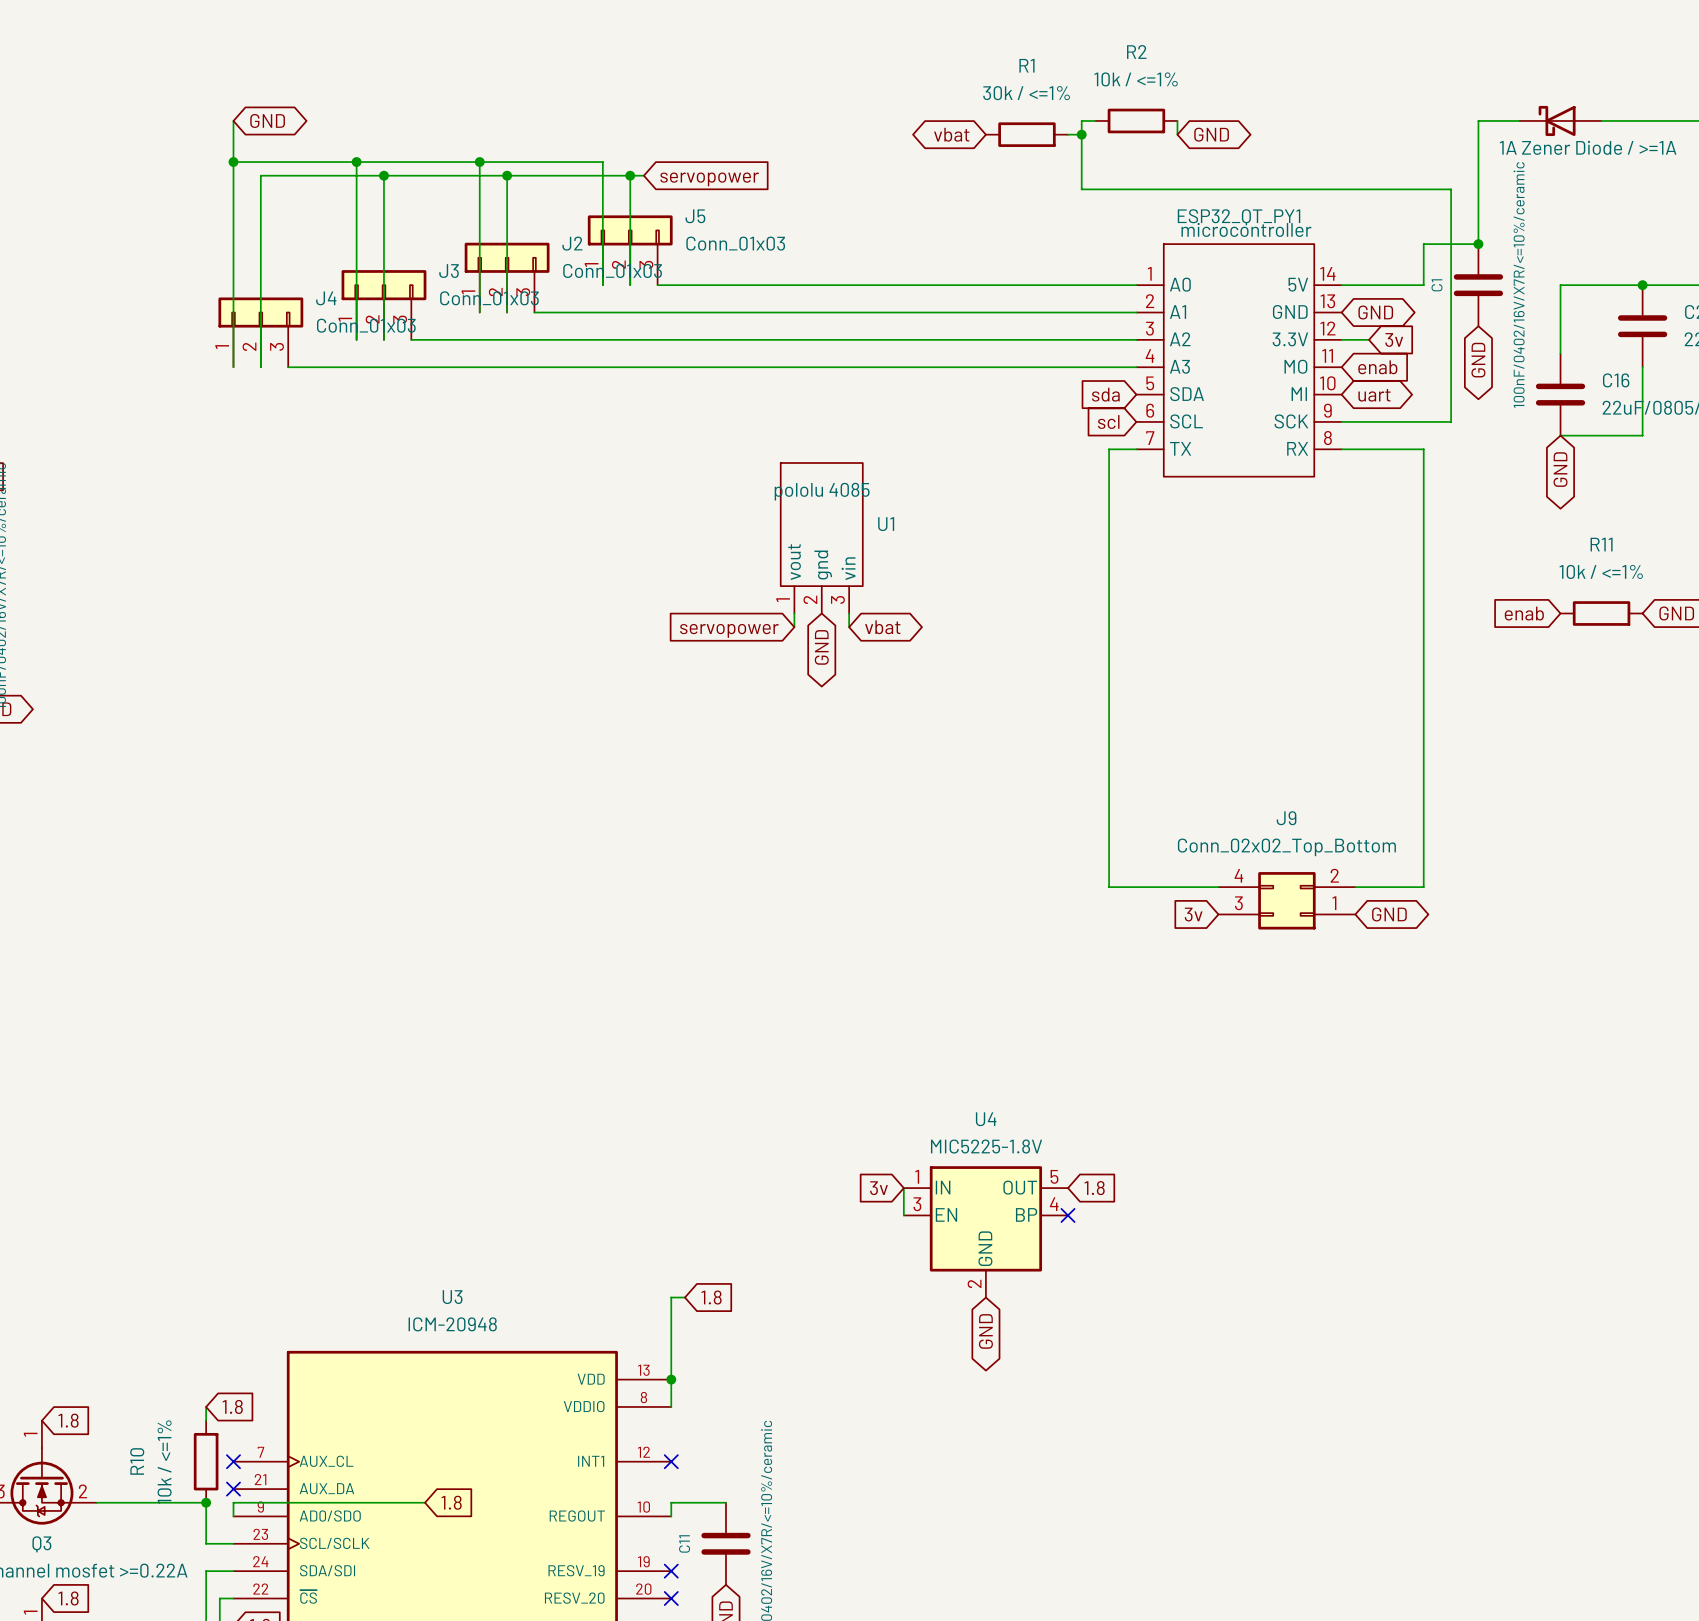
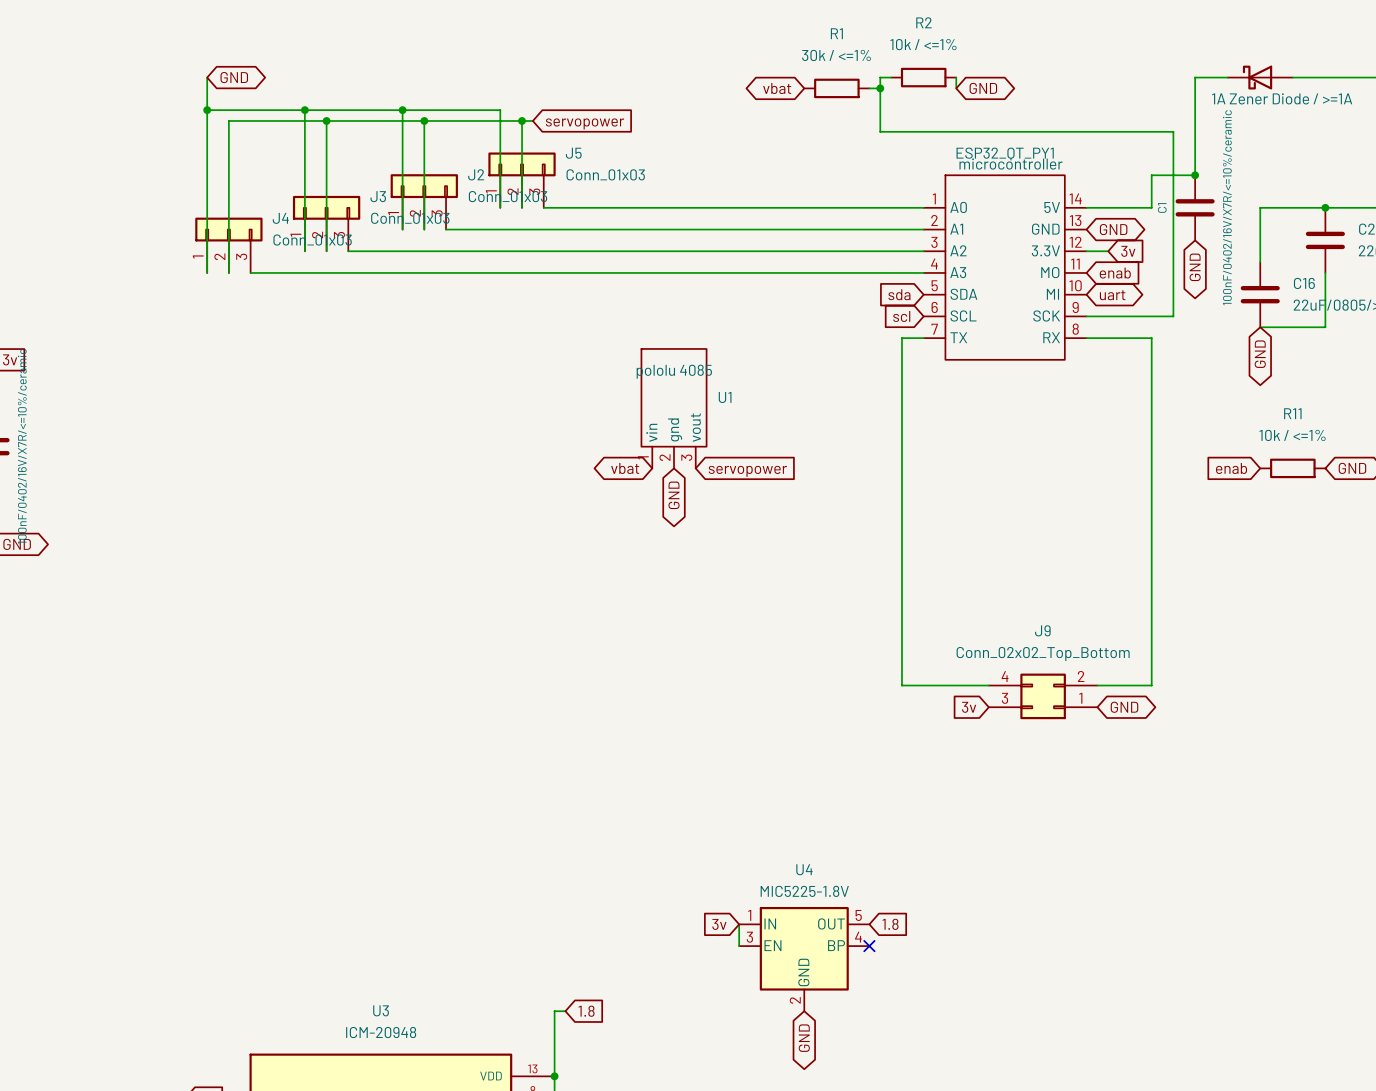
U1 pin name: vout (794, 562) -> vin (651, 432)
U1 pin name: vin (848, 568) -> vout (695, 427)
wire: (794, 613) (794, 627) -> none
wire: (849, 613) (849, 627) -> none
global label rotation: 0° (882, 627) -> 180° (625, 468)
global label position: vbat (882, 627) -> vbat (625, 468)
global label rotation: 0° (729, 630) -> 180° (747, 471)
global label position: servopower (729, 630) -> servopower (747, 471)

